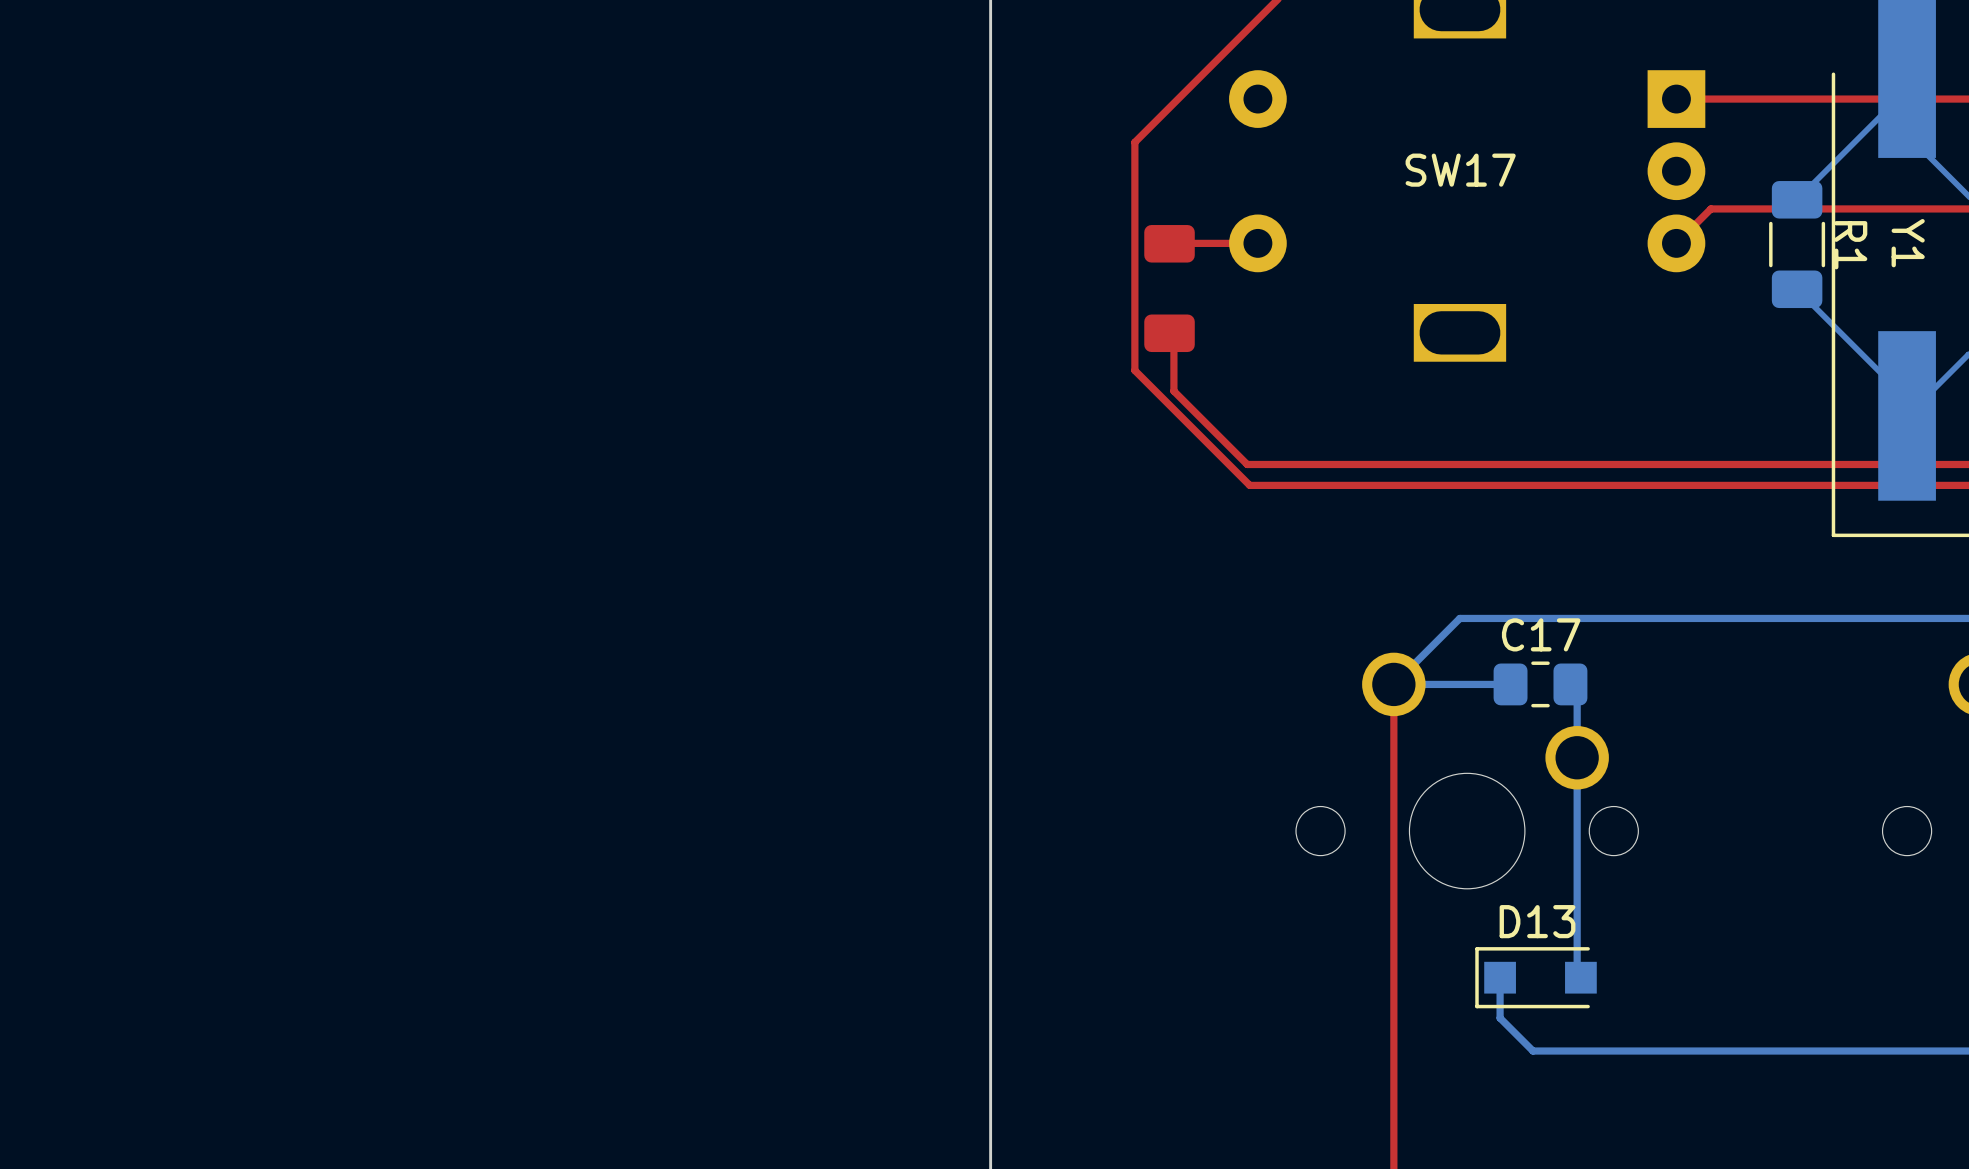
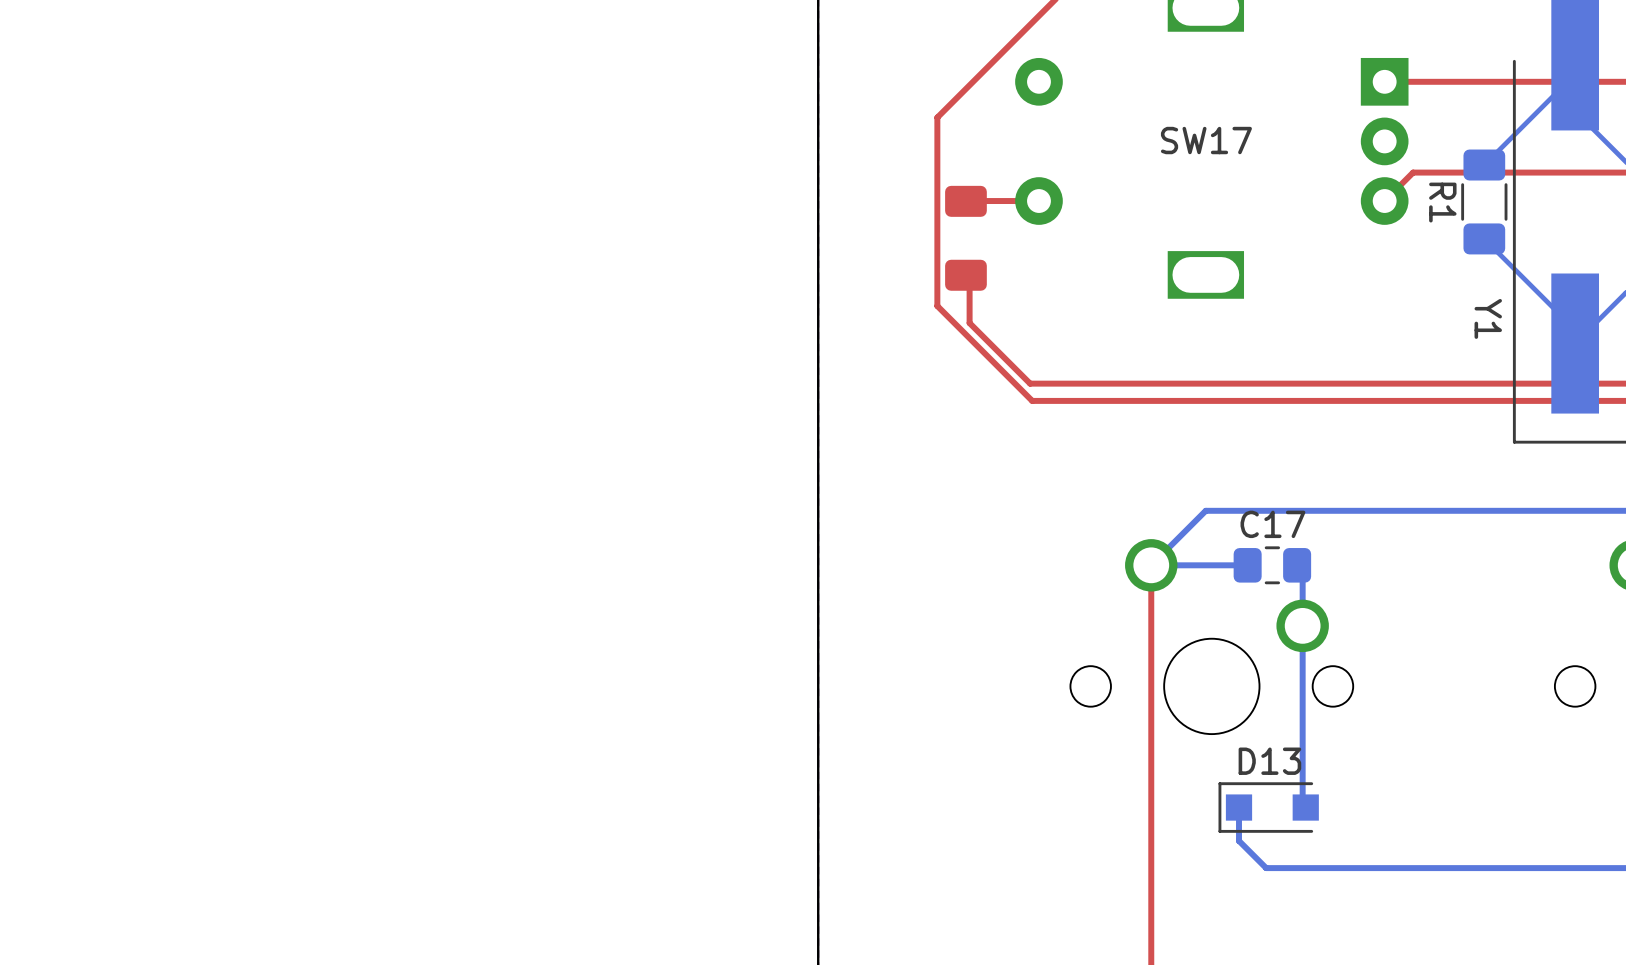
Y1 name position: Y1 (1908, 243) -> Y1 (1488, 318)
R1 name position: R1 (1850, 245) -> R1 (1442, 202)

